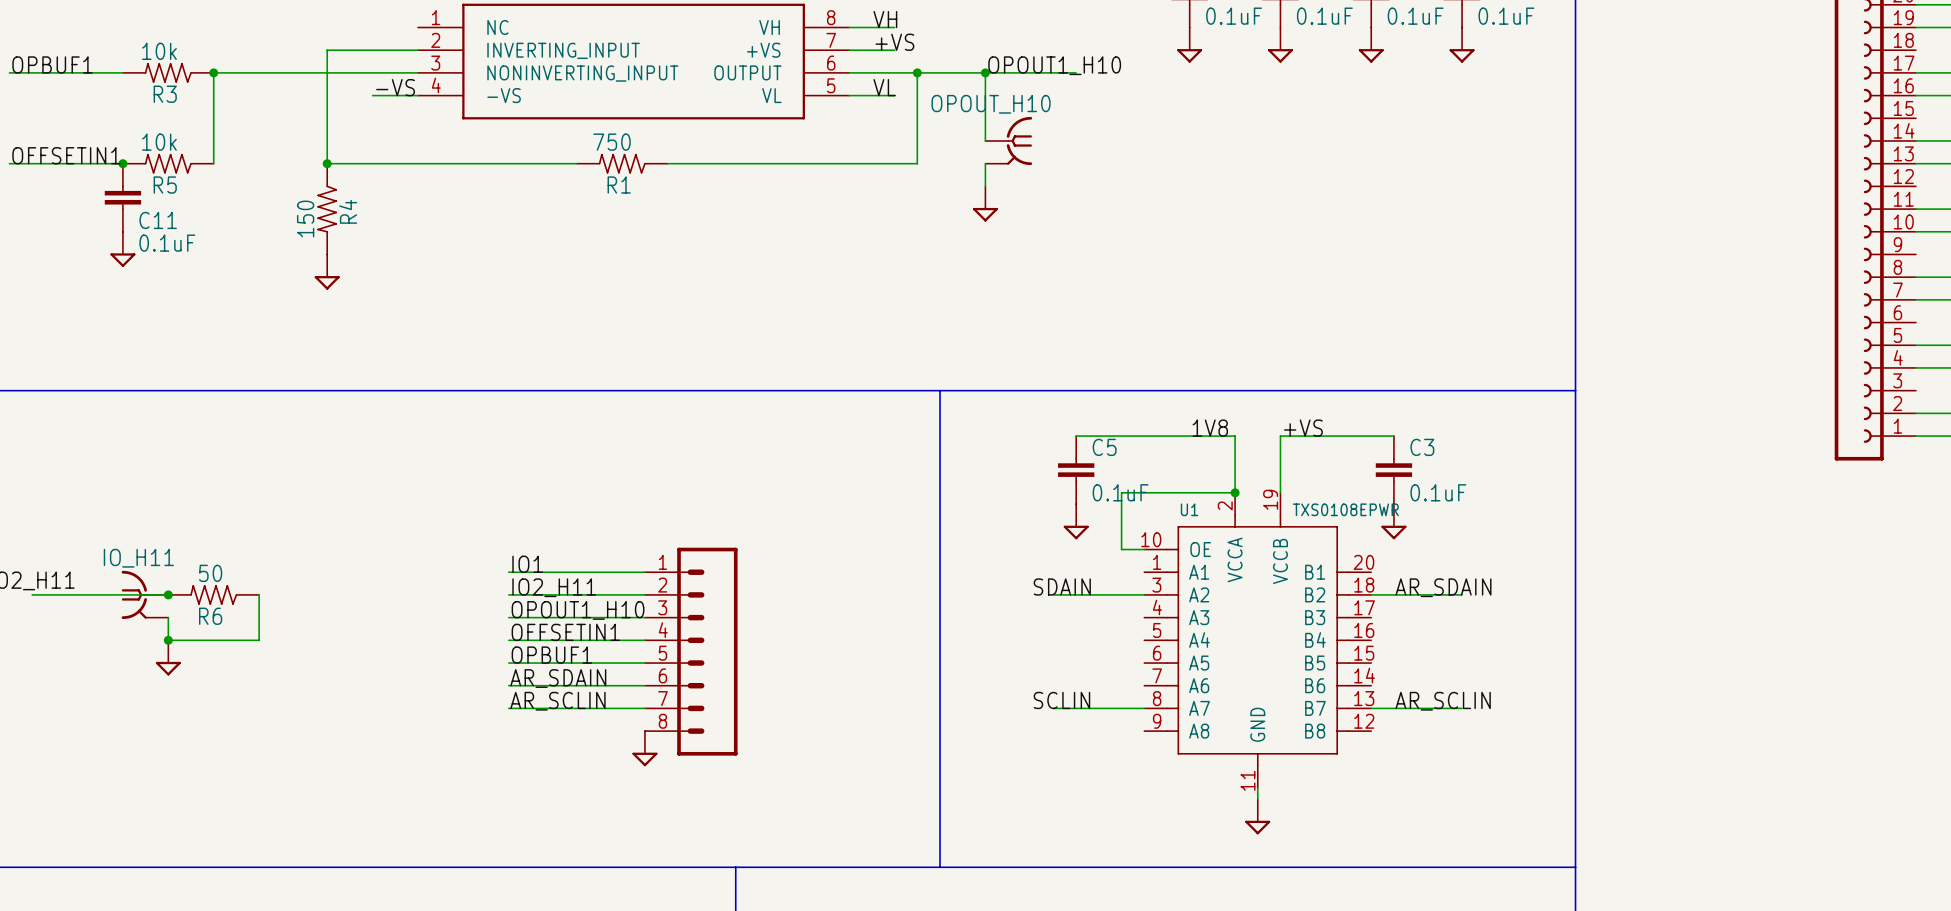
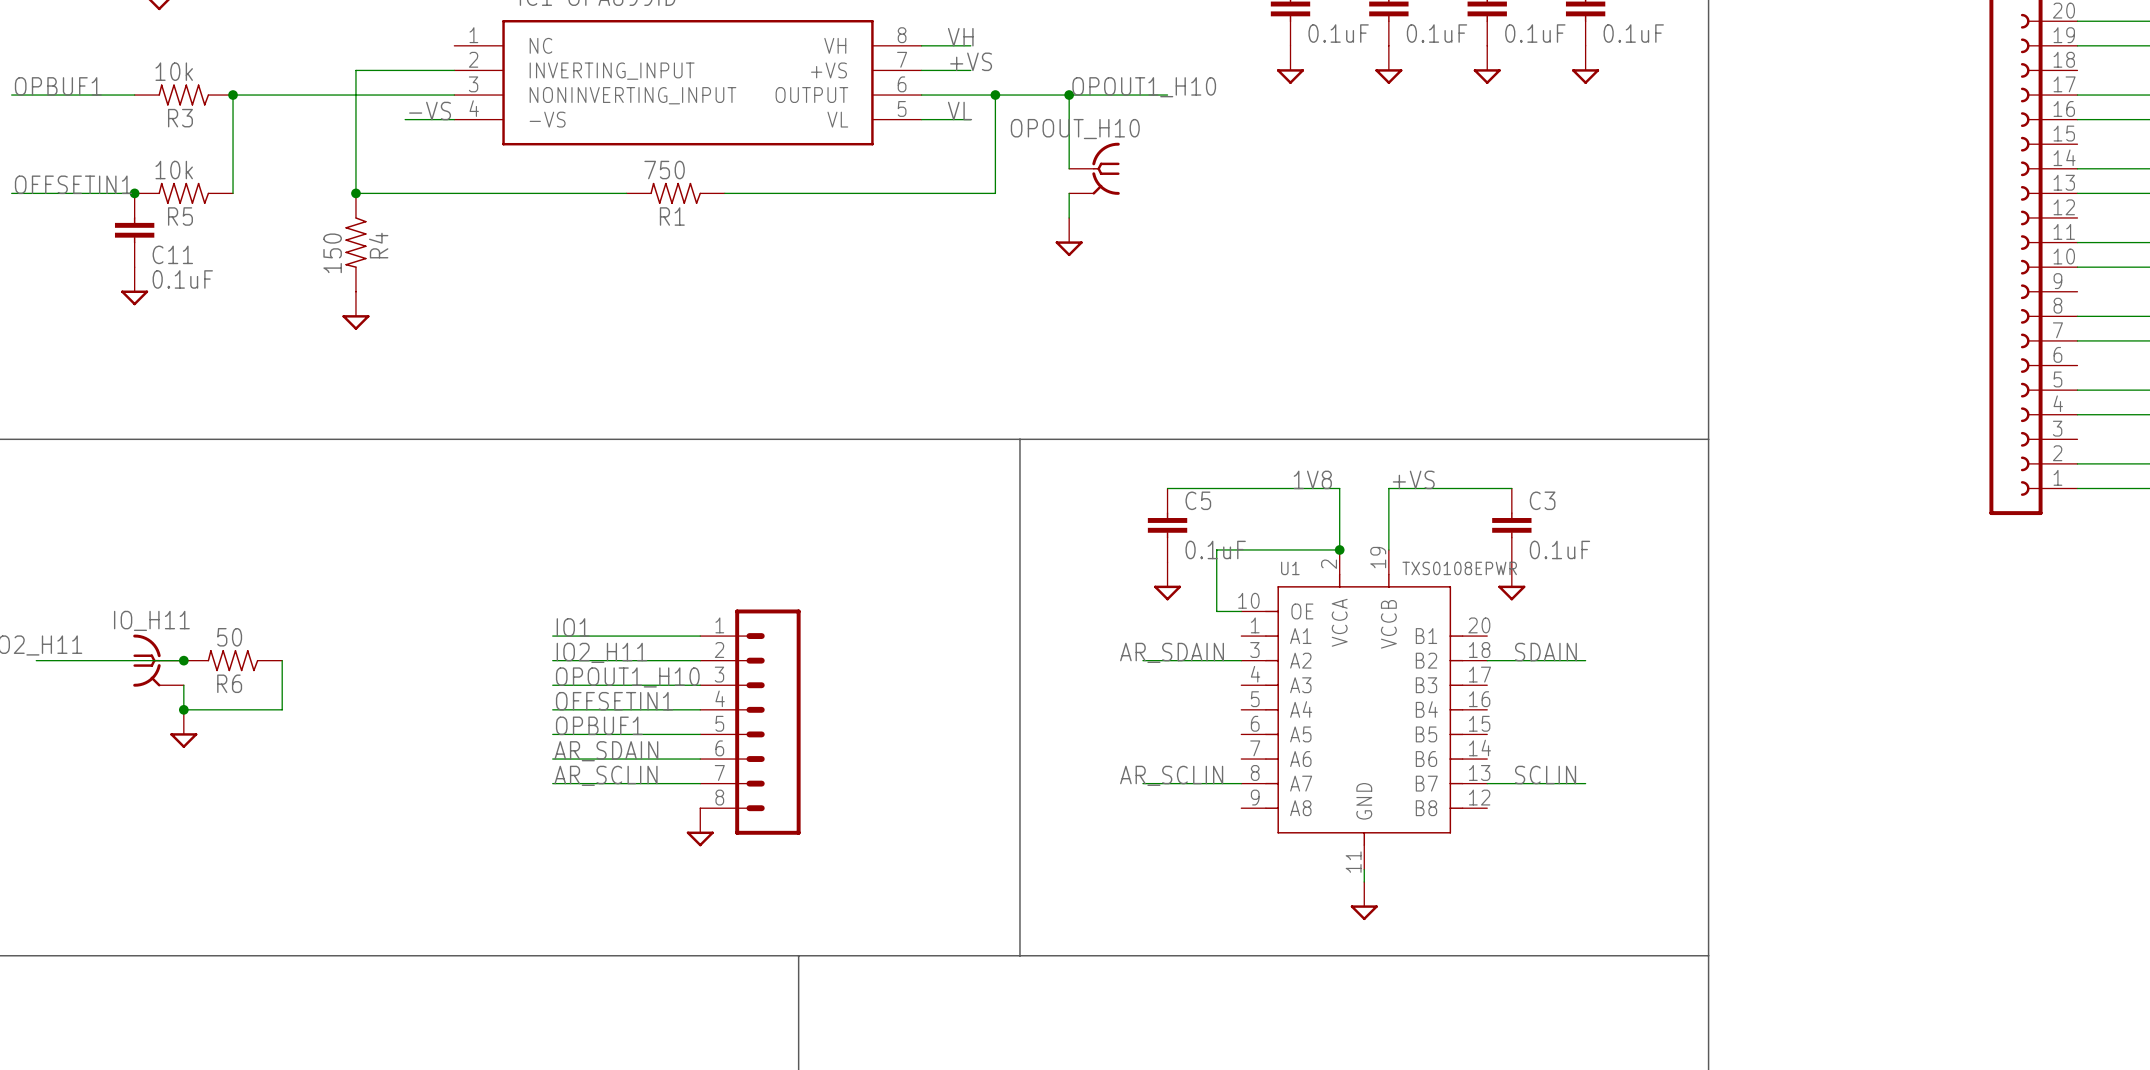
label: SDAIN (1062, 586) -> AR_SDAIN (1172, 652)
label: AR_SDAIN (1443, 587) -> SDAIN (1545, 652)
label: SCLIN (1061, 700) -> AR_SCLIN (1171, 775)
label: AR_SCLIN (1443, 701) -> SCLIN (1545, 775)

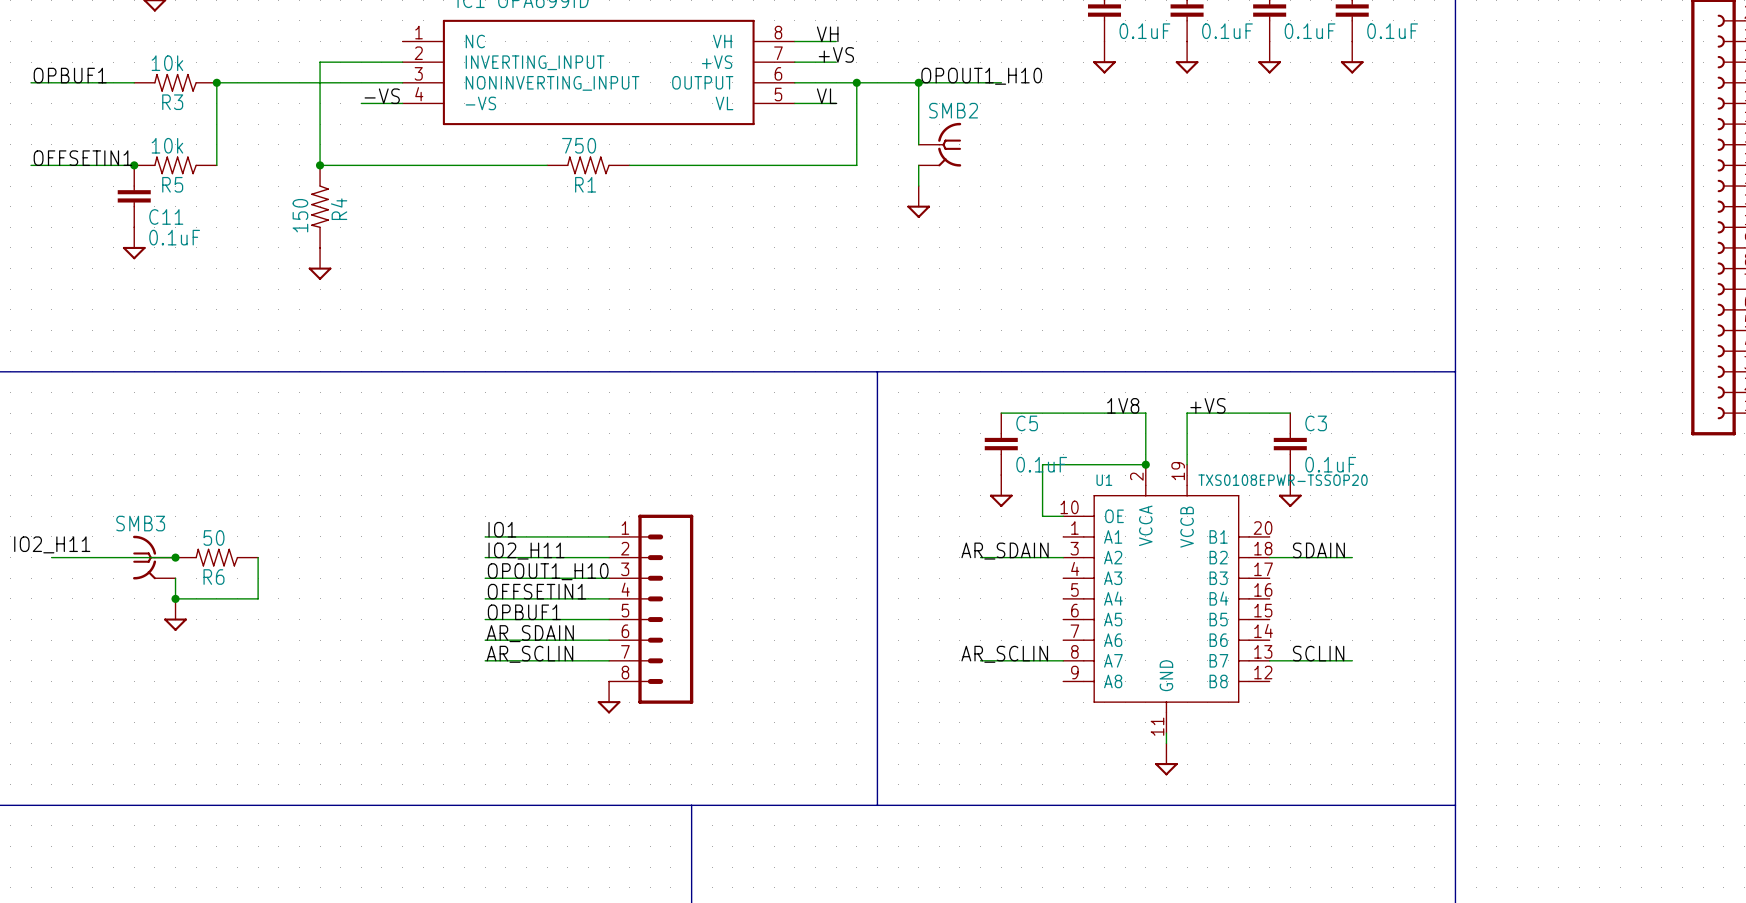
OPOUT_H10 name: OPOUT_H10 (1075, 129) -> SMB2 (953, 110)
U1 value: TXS0108EPWR (1459, 568) -> TXS0108EPWR-TSSOP20 (1283, 480)
IO_H11 name: IO_H11 (151, 620) -> SMB3 (140, 523)

